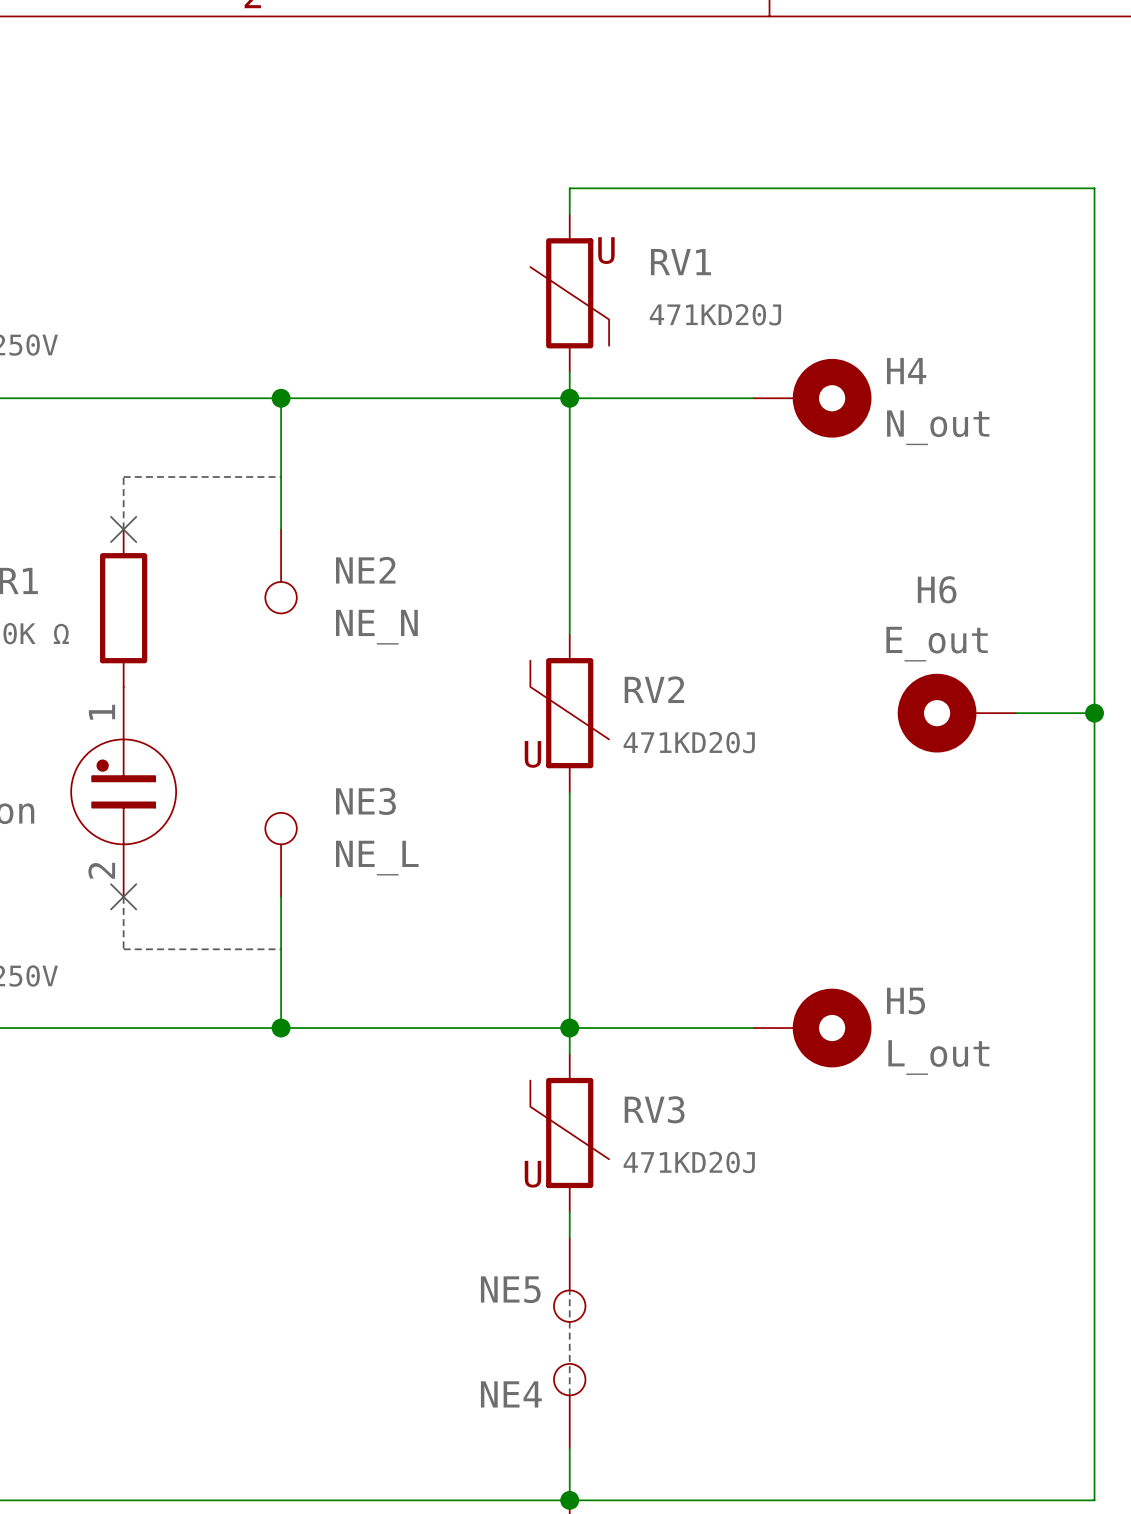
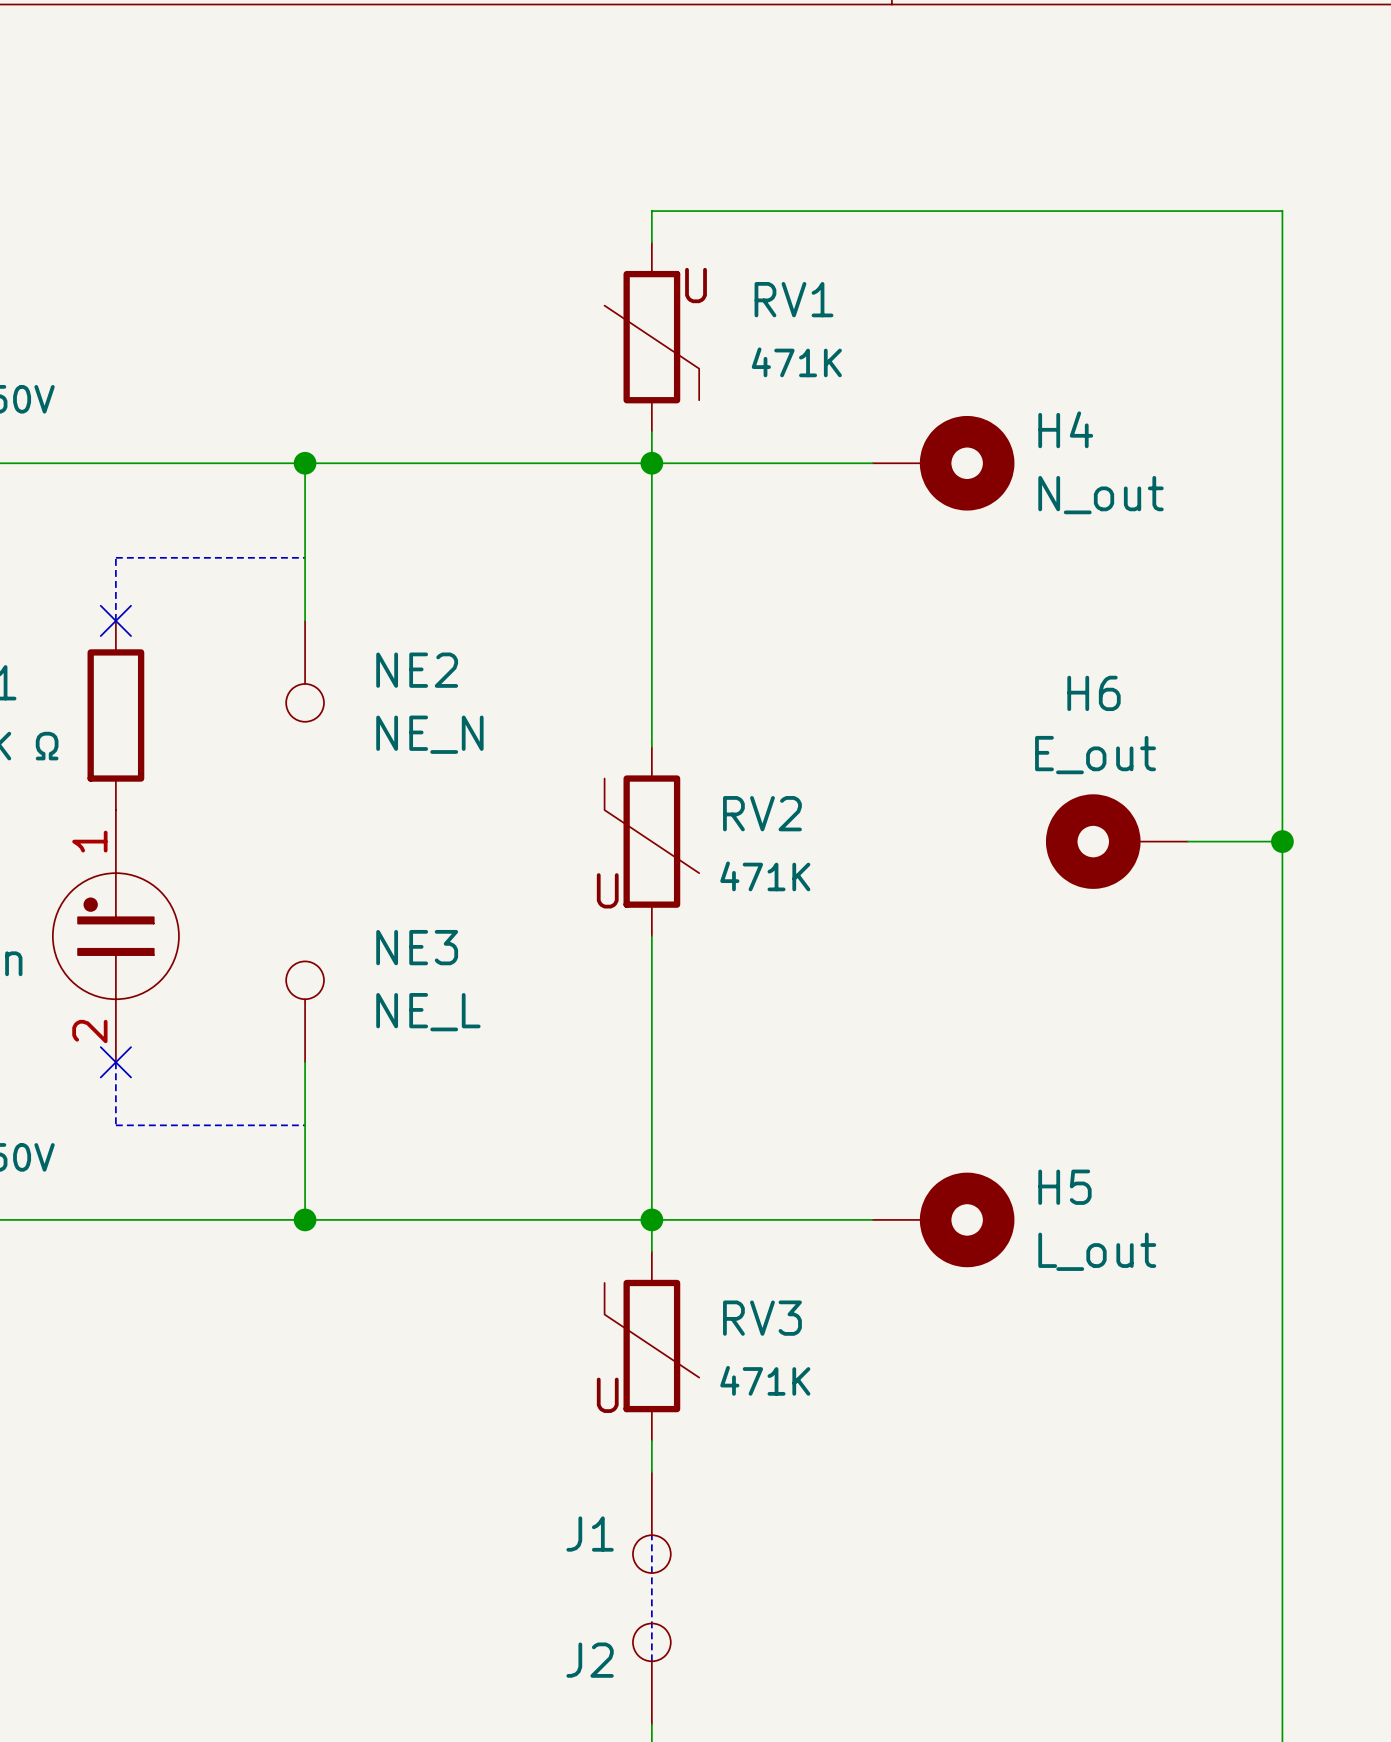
RV1 value: 471KD20J (715, 314) -> 471K (796, 362)
RV2 value: 471KD20J (689, 742) -> 471K (765, 876)
RV3 value: 471KD20J (689, 1162) -> 471K (765, 1380)
NE5 name: NE5 (510, 1289) -> J1 (590, 1534)
NE4 name: NE4 (511, 1394) -> J2 (590, 1660)

